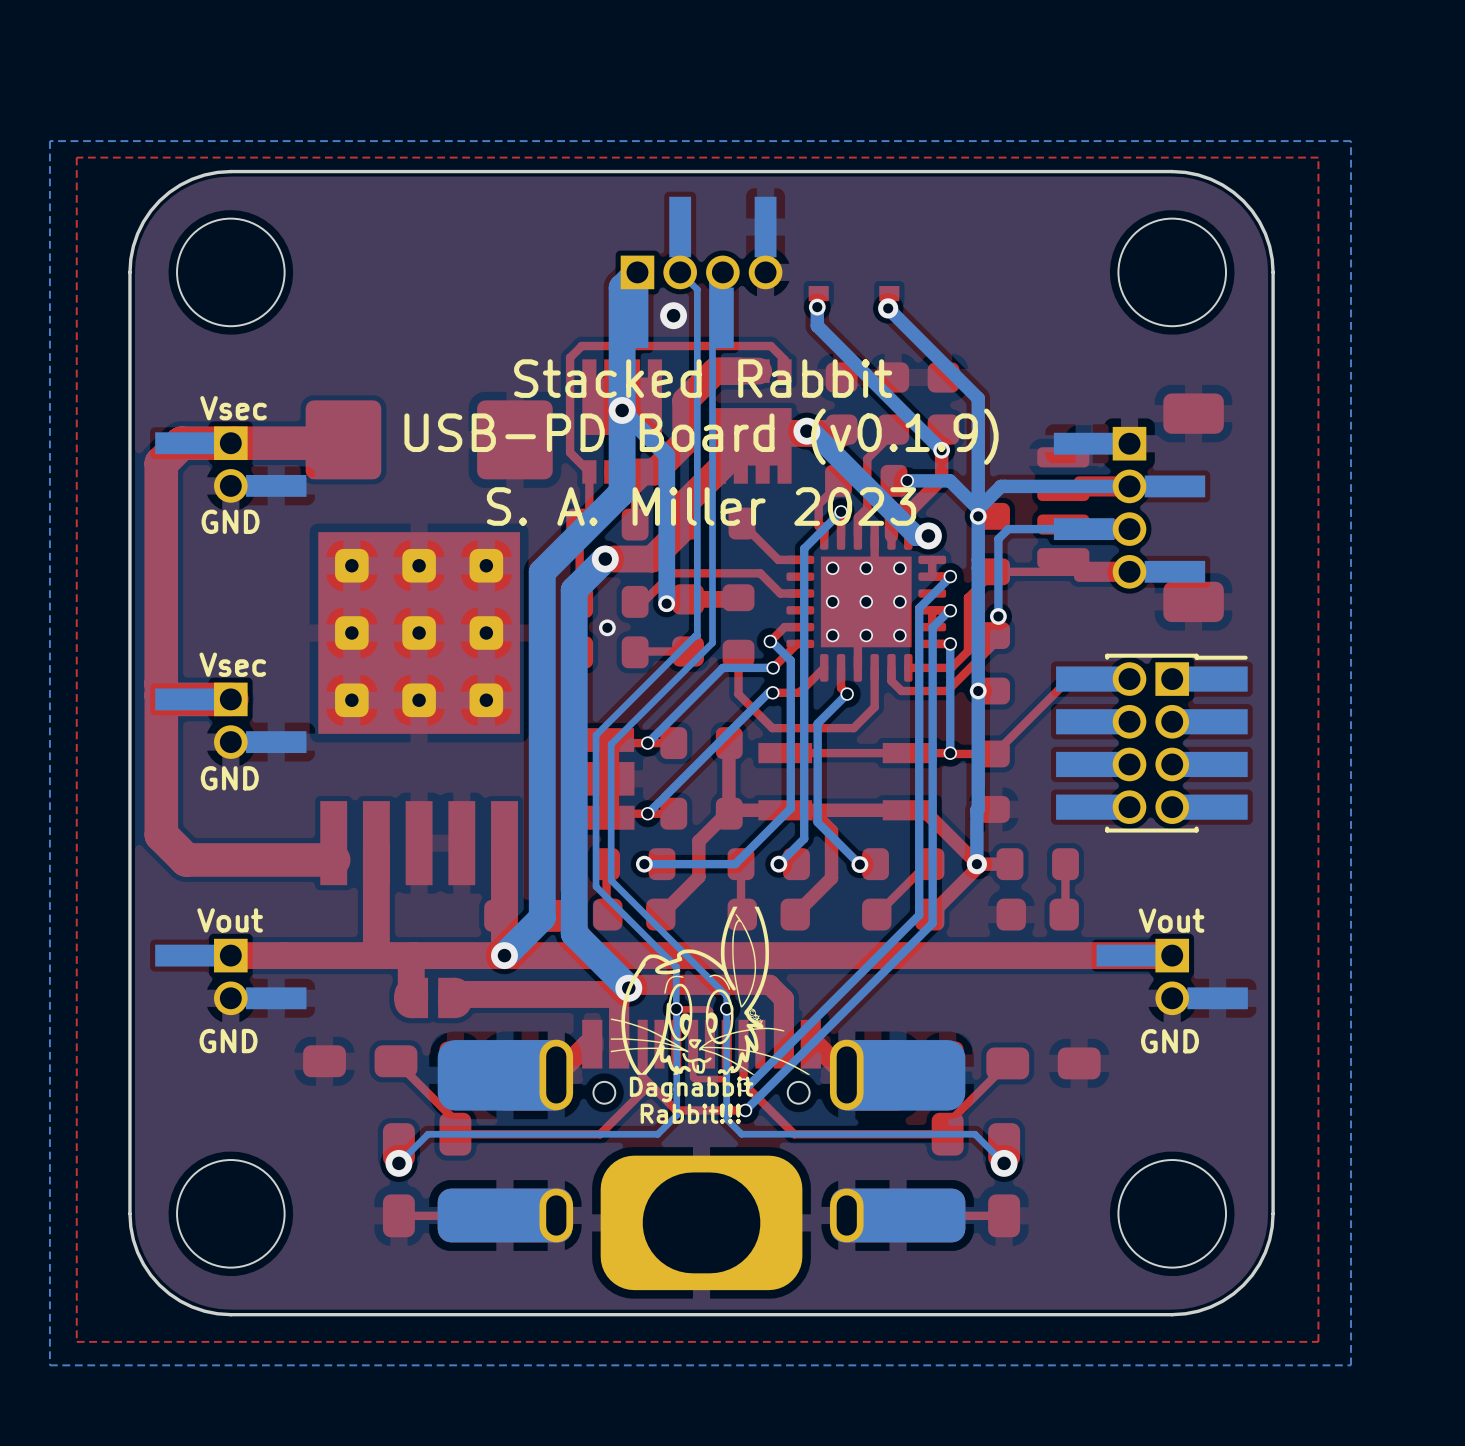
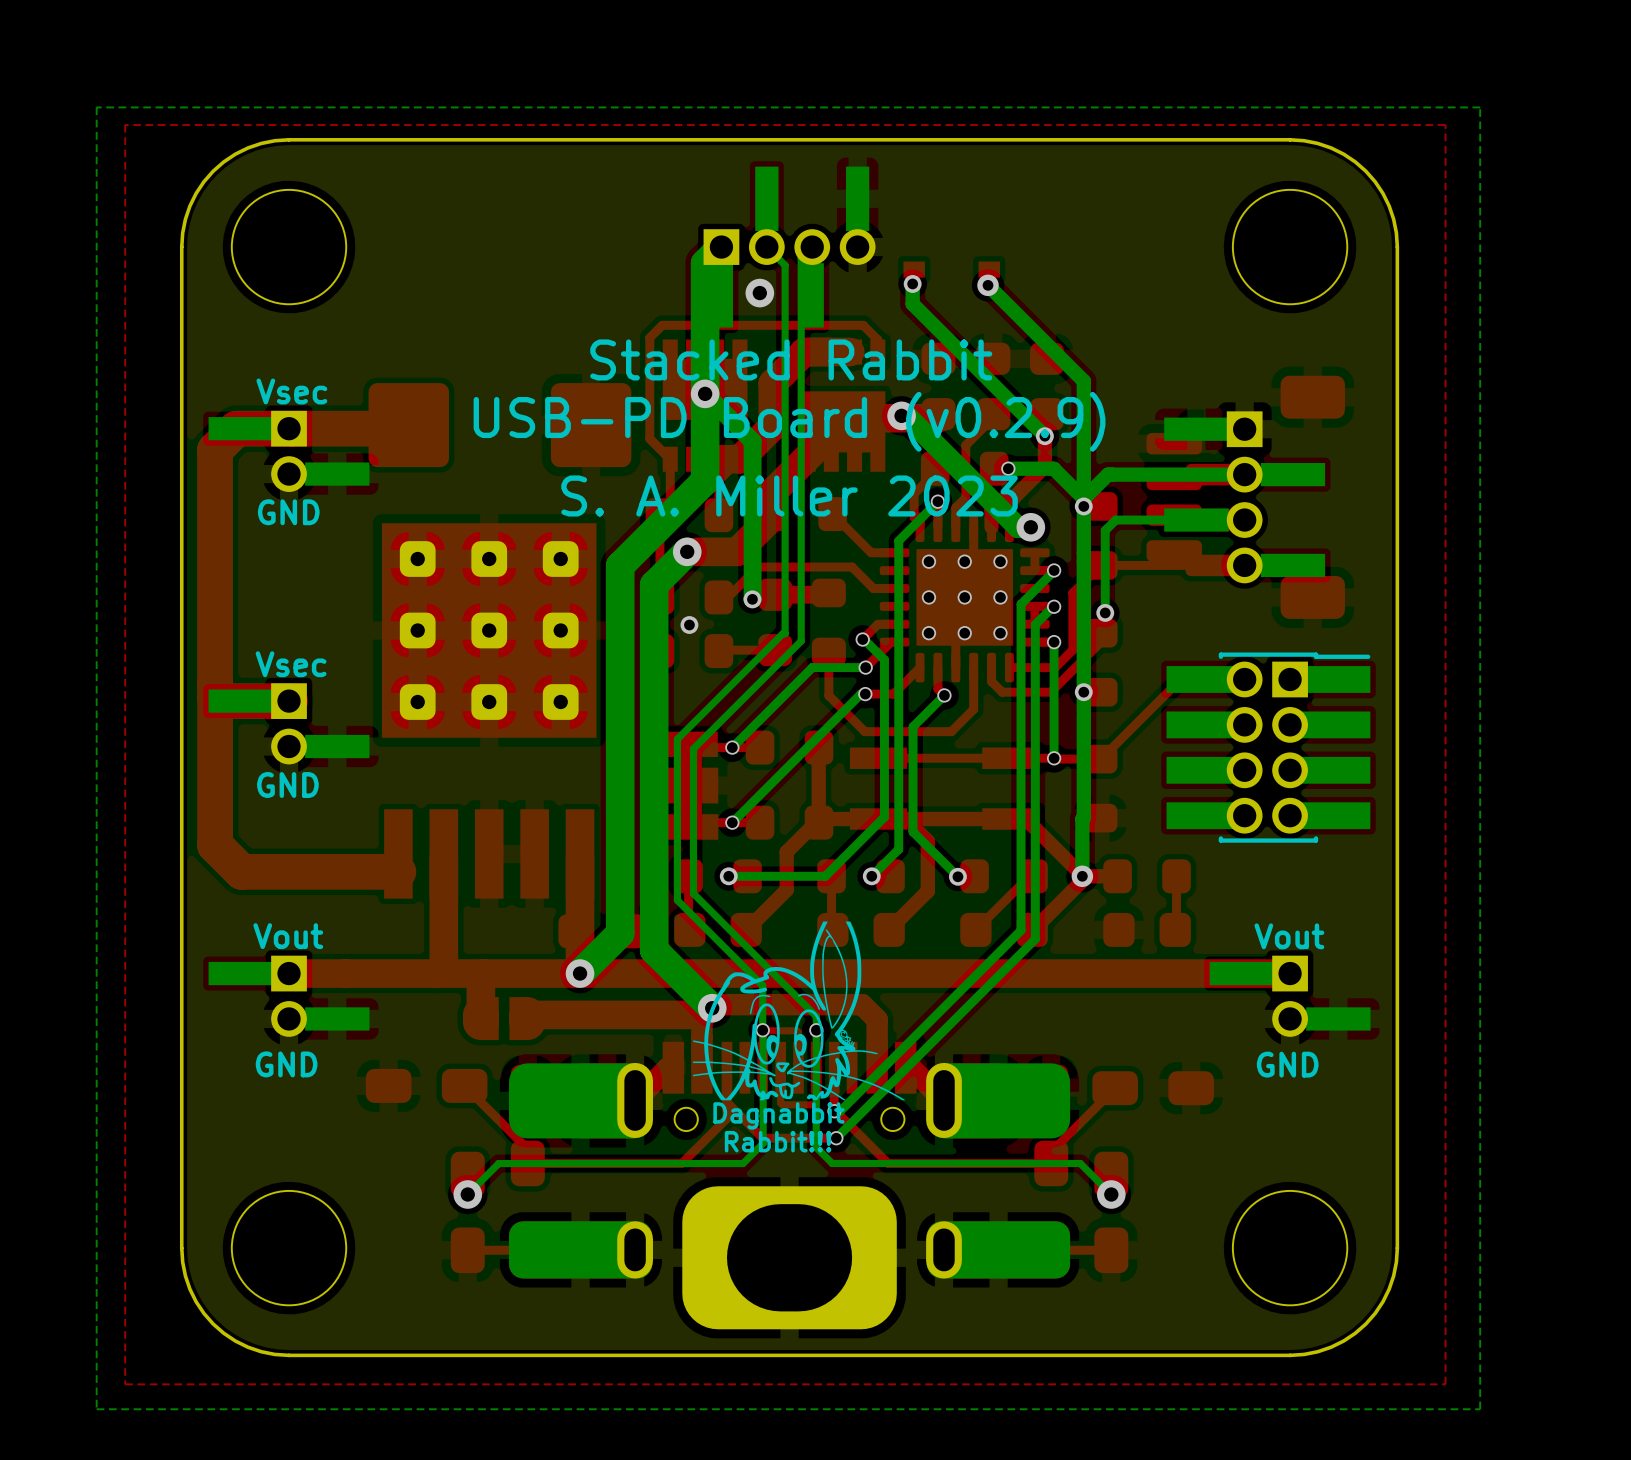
text: USB-PD Board (v0.1.9) (701, 436) -> USB-PD Board (v0.2.9) (789, 421)

